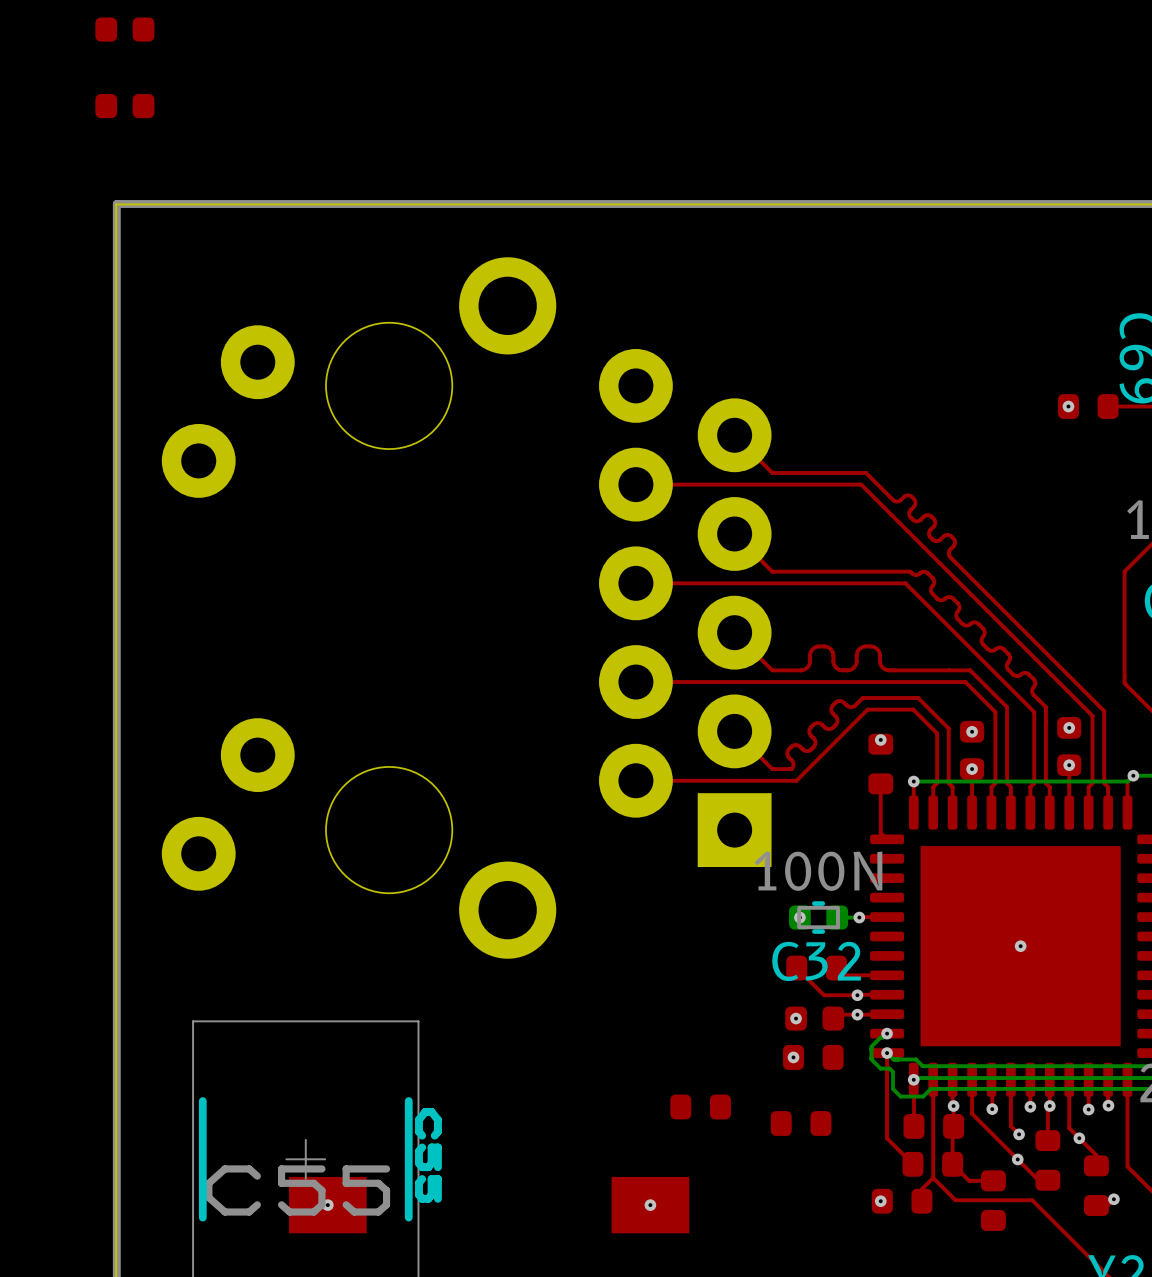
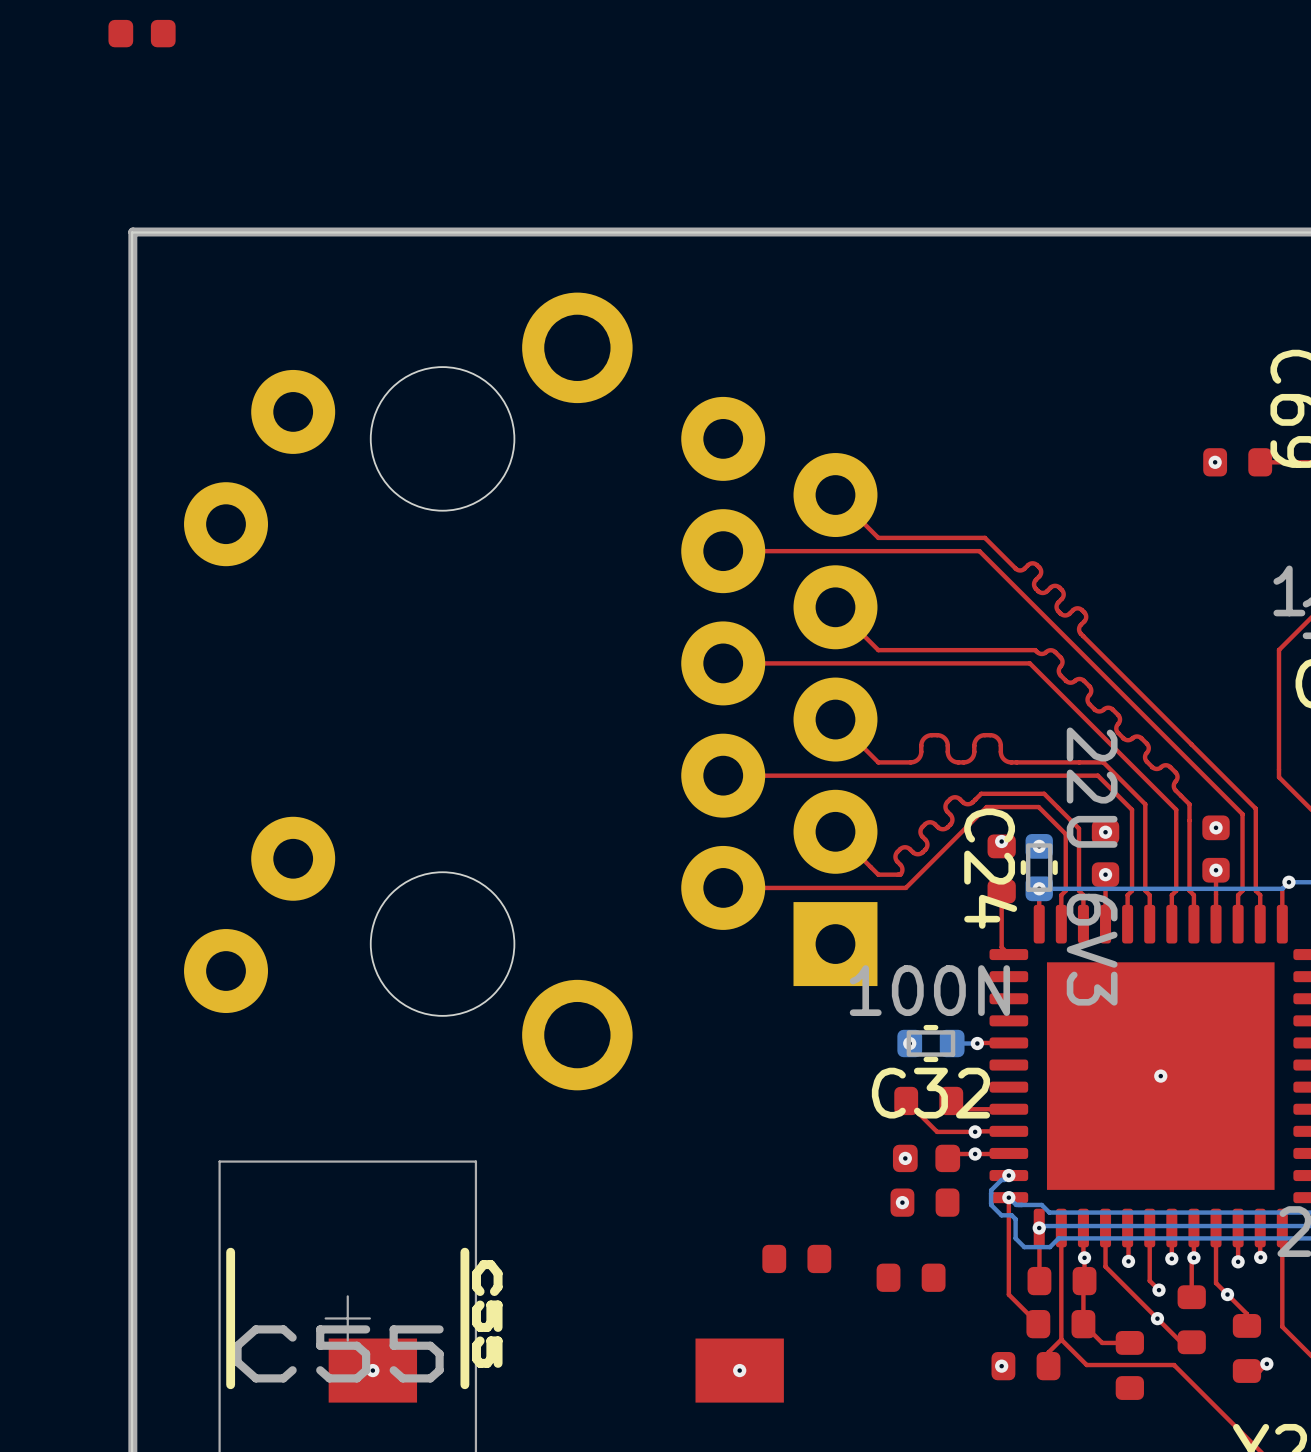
part: (124, 106) -> none
via: none -> (1039, 846)
C24: none -> 22U 6V3 (1039, 867)

